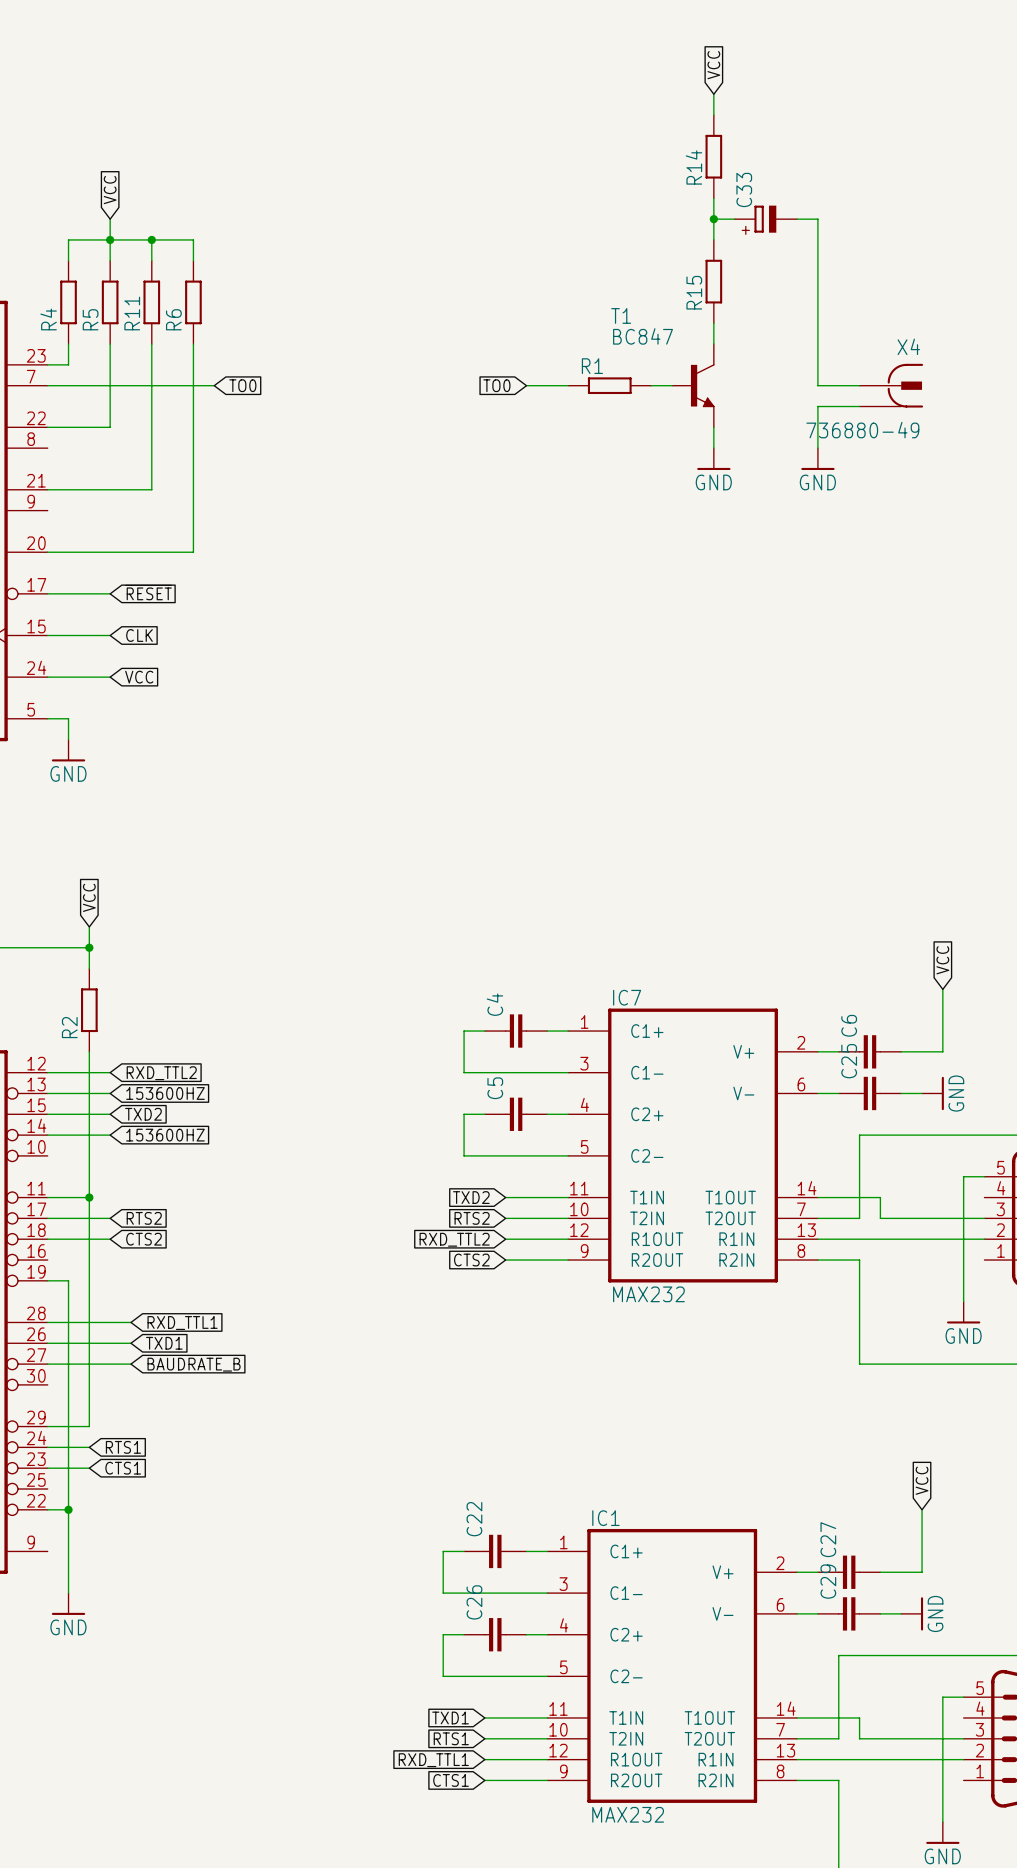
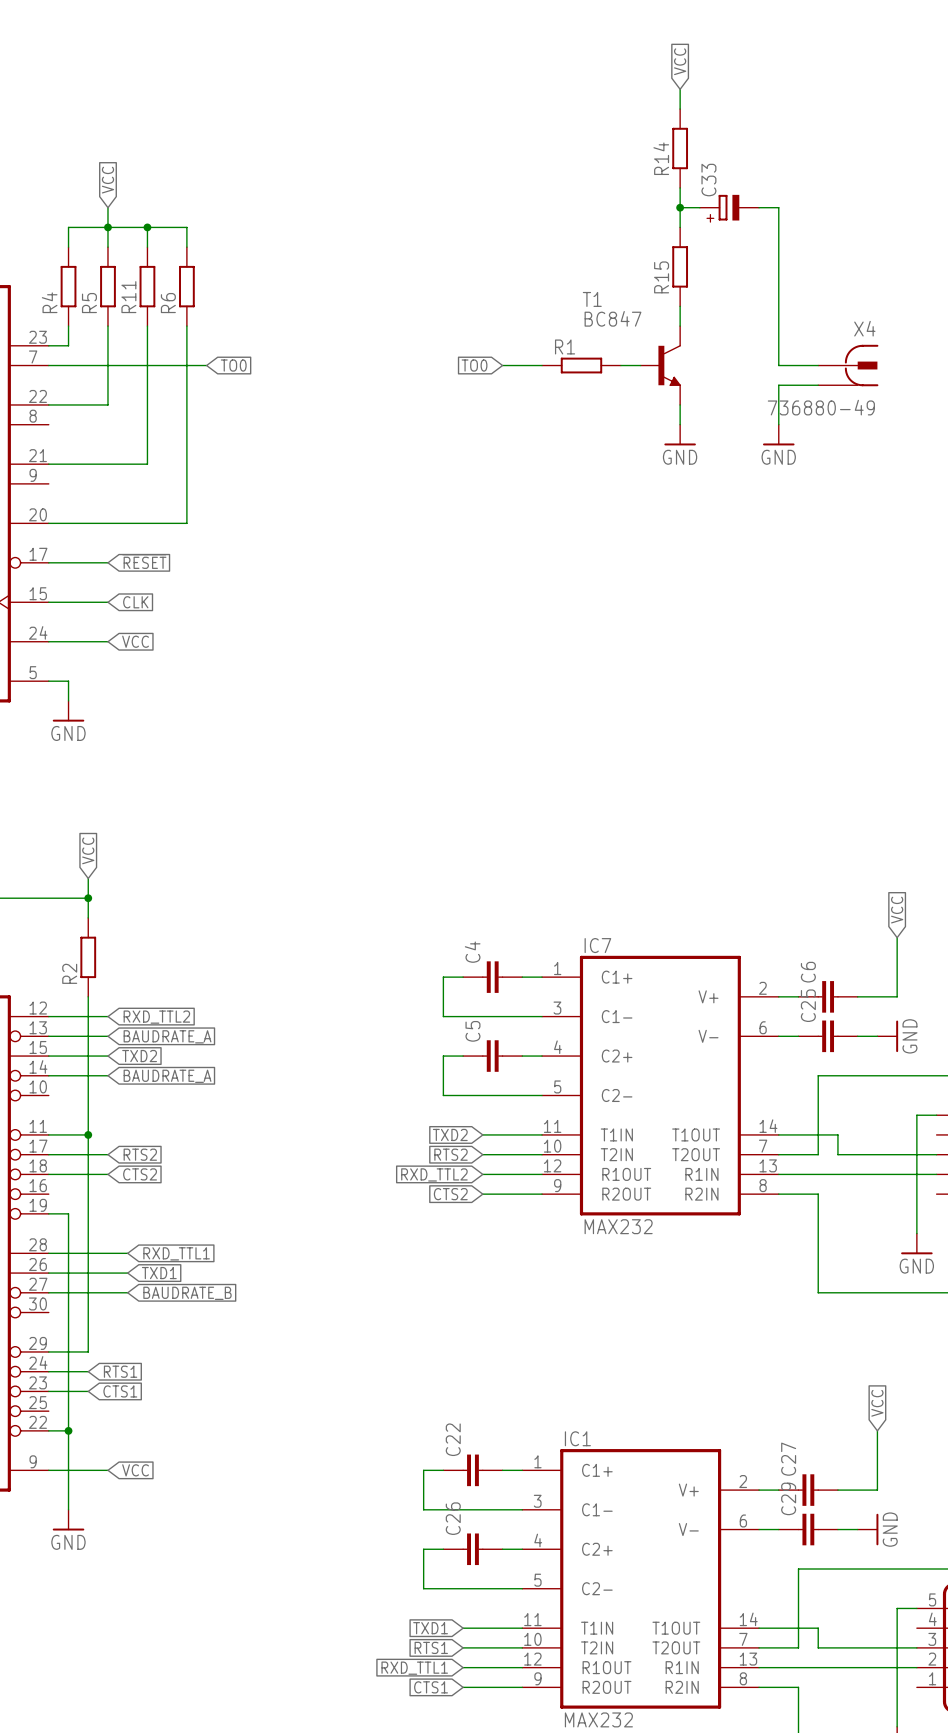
global label: 153600HZ (165, 1093) -> BAUDRATE_A (167, 1036)
global label: 153600HZ (165, 1135) -> BAUDRATE_A (167, 1076)
wire: none -> (48, 1470) (107, 1470)
global label: none -> VCC (135, 1470)

